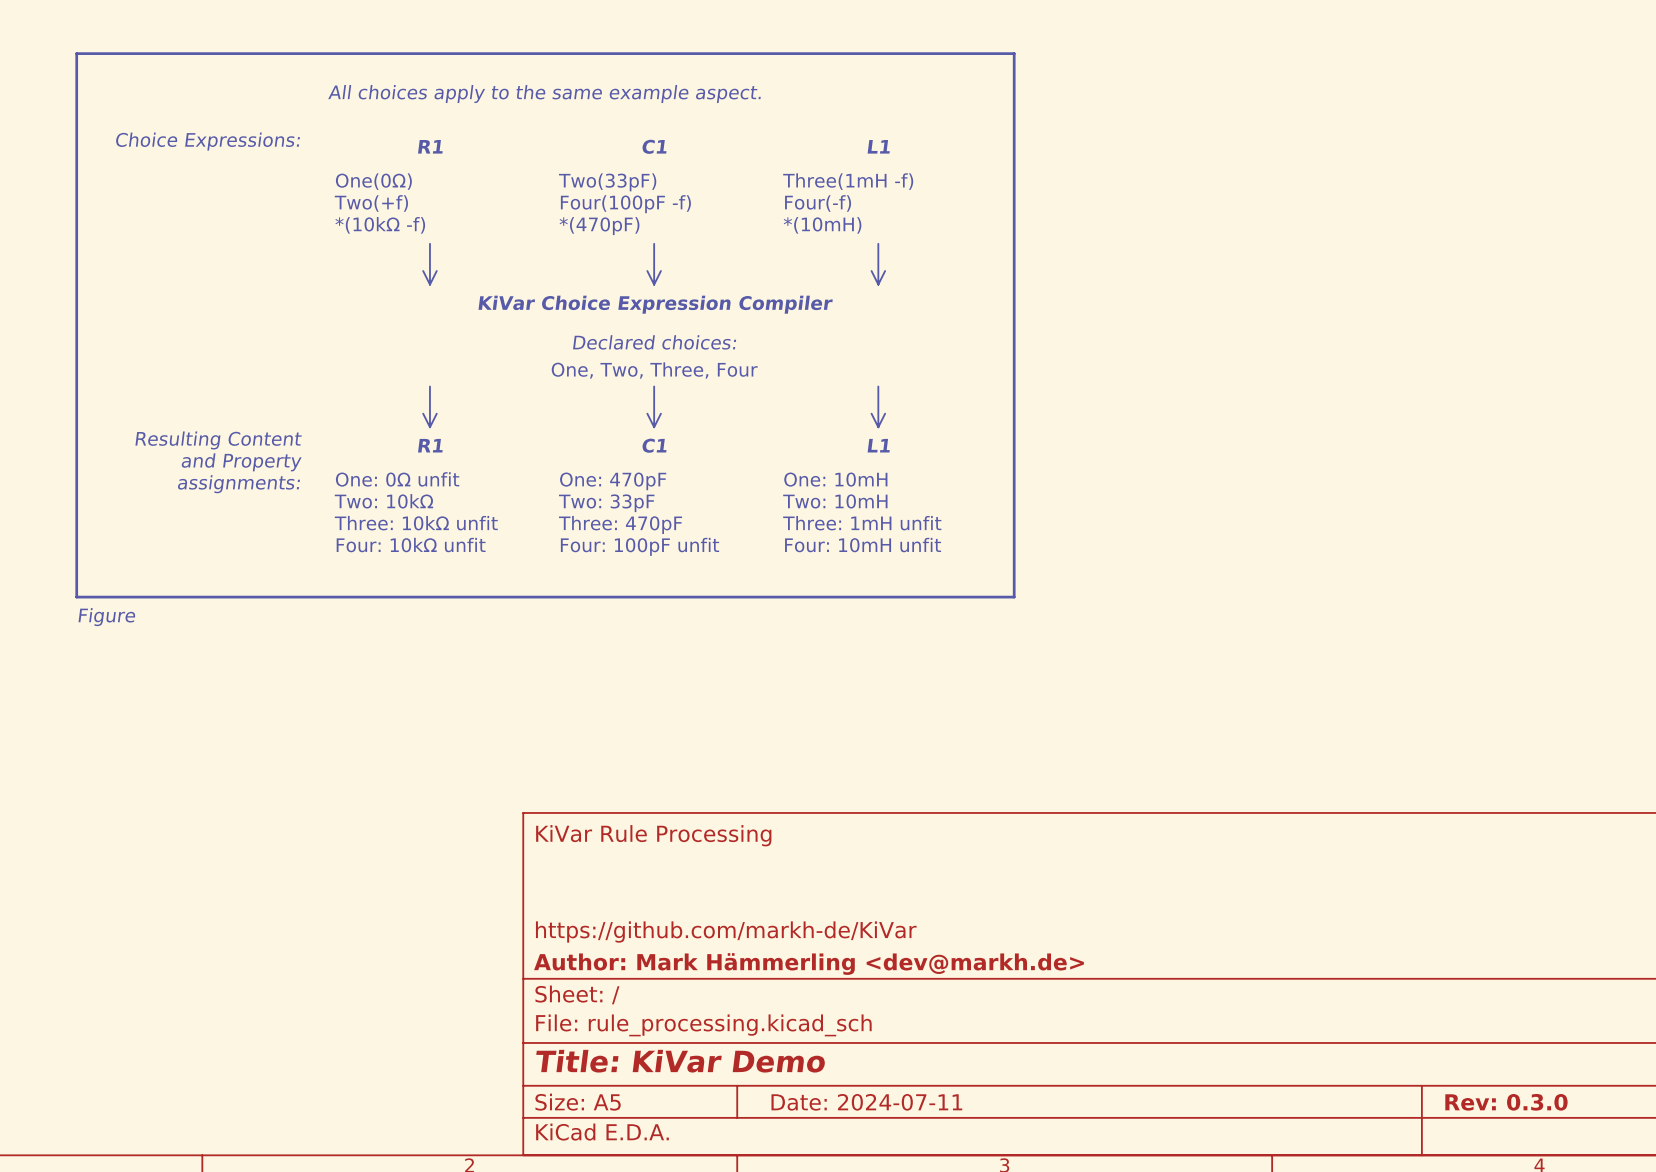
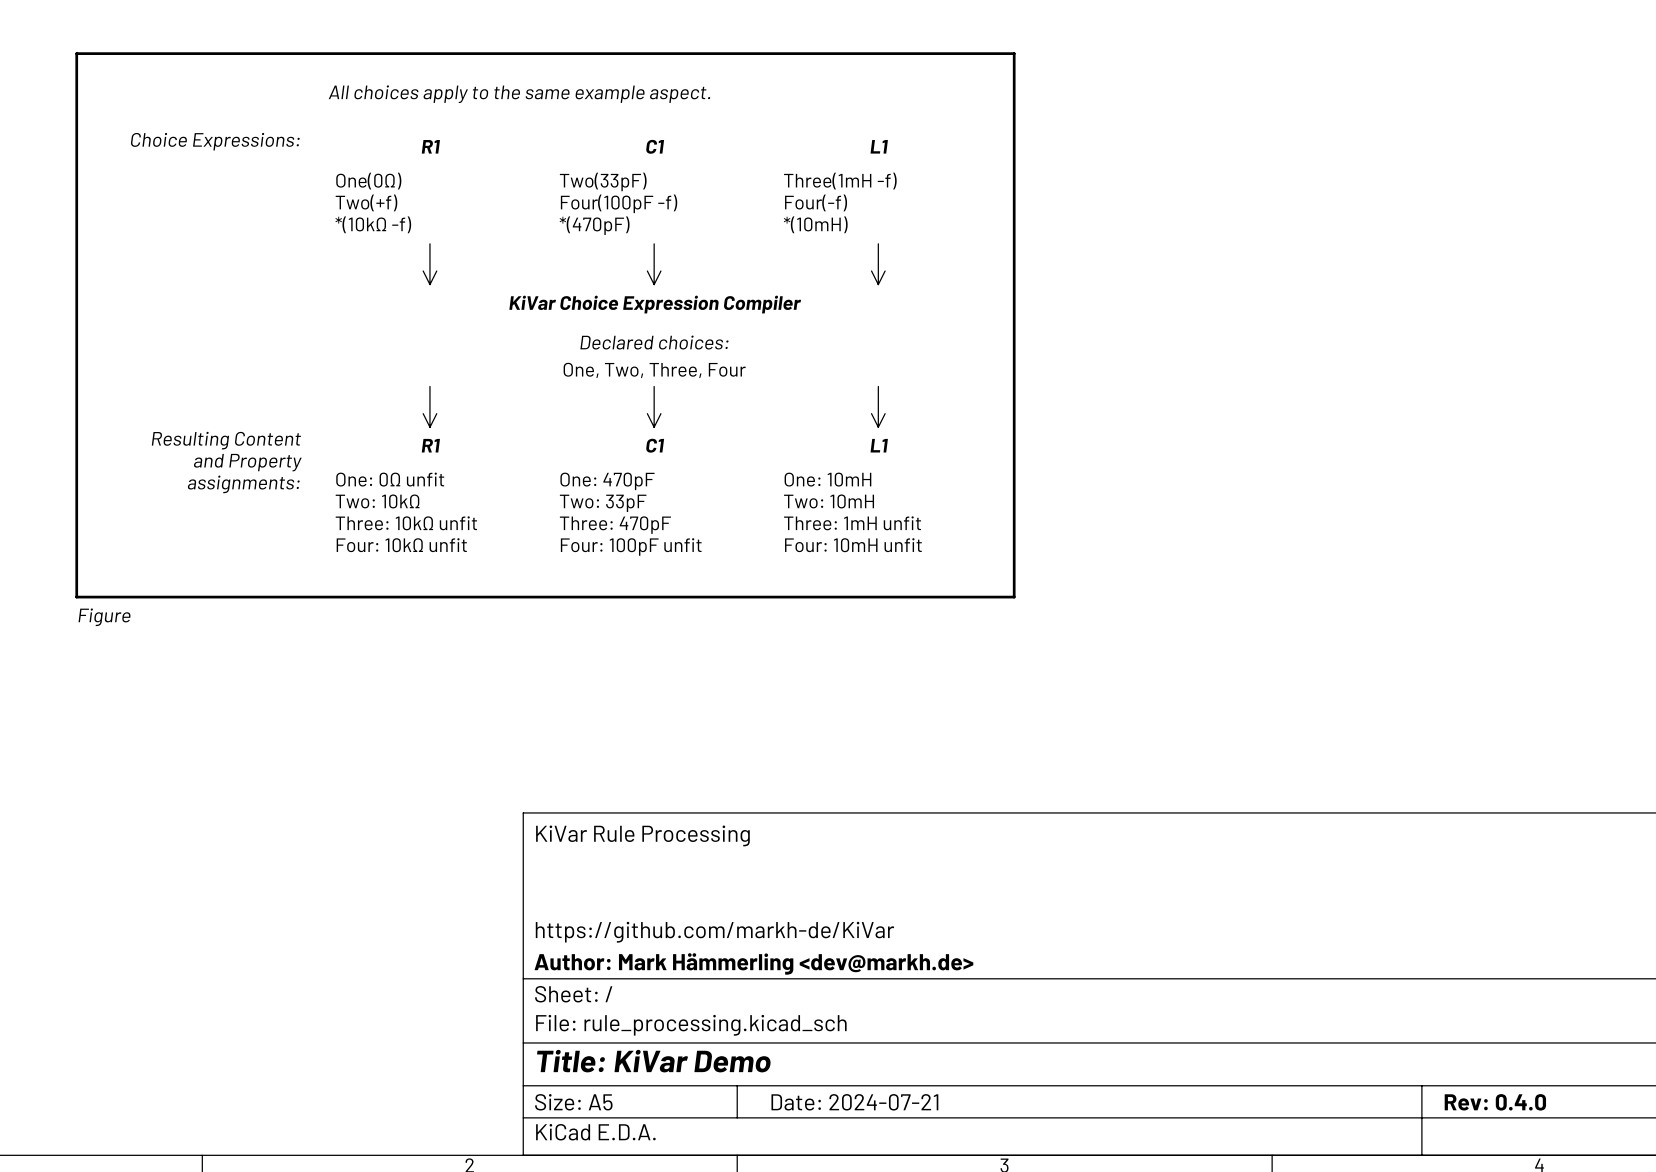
title block: Date: 2024-07-11 (866, 1102) -> Date: 2024-07-21 (854, 1102)
title block: Rev: 0.3.0 (1506, 1102) -> Rev: 0.4.0 (1495, 1102)

